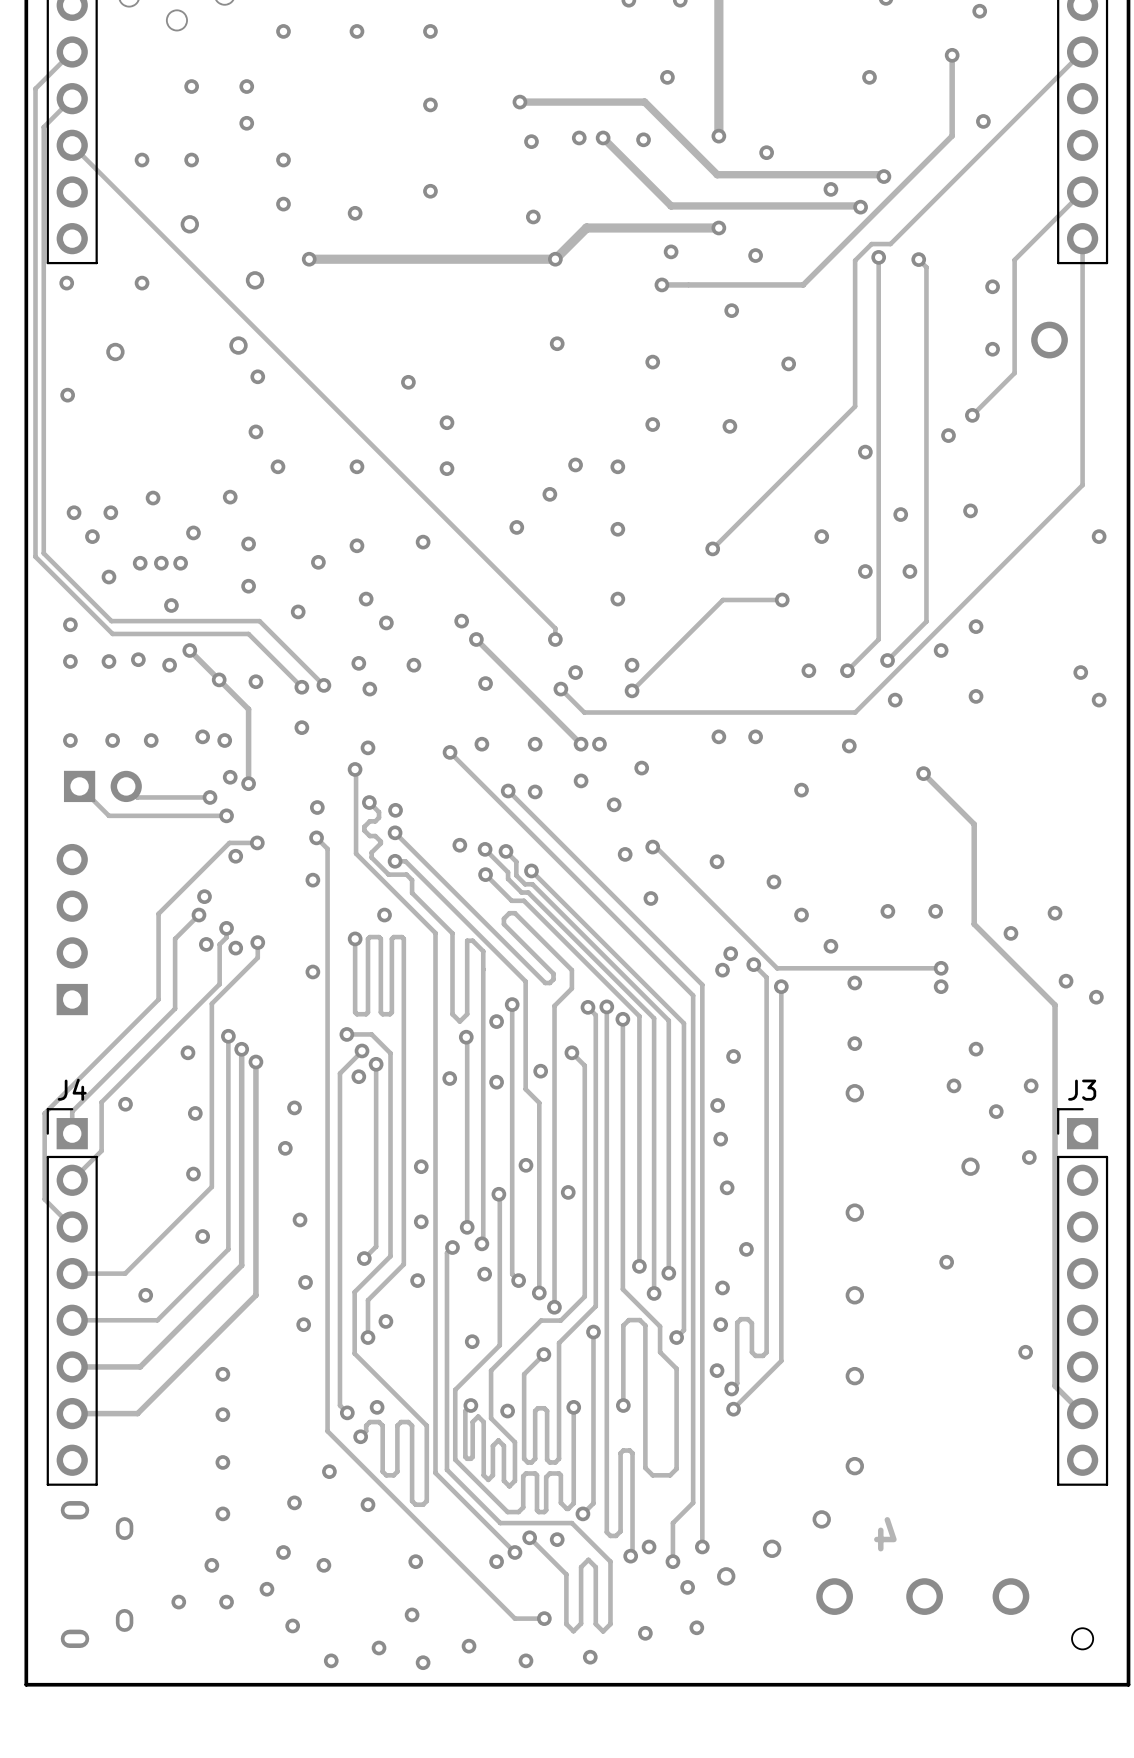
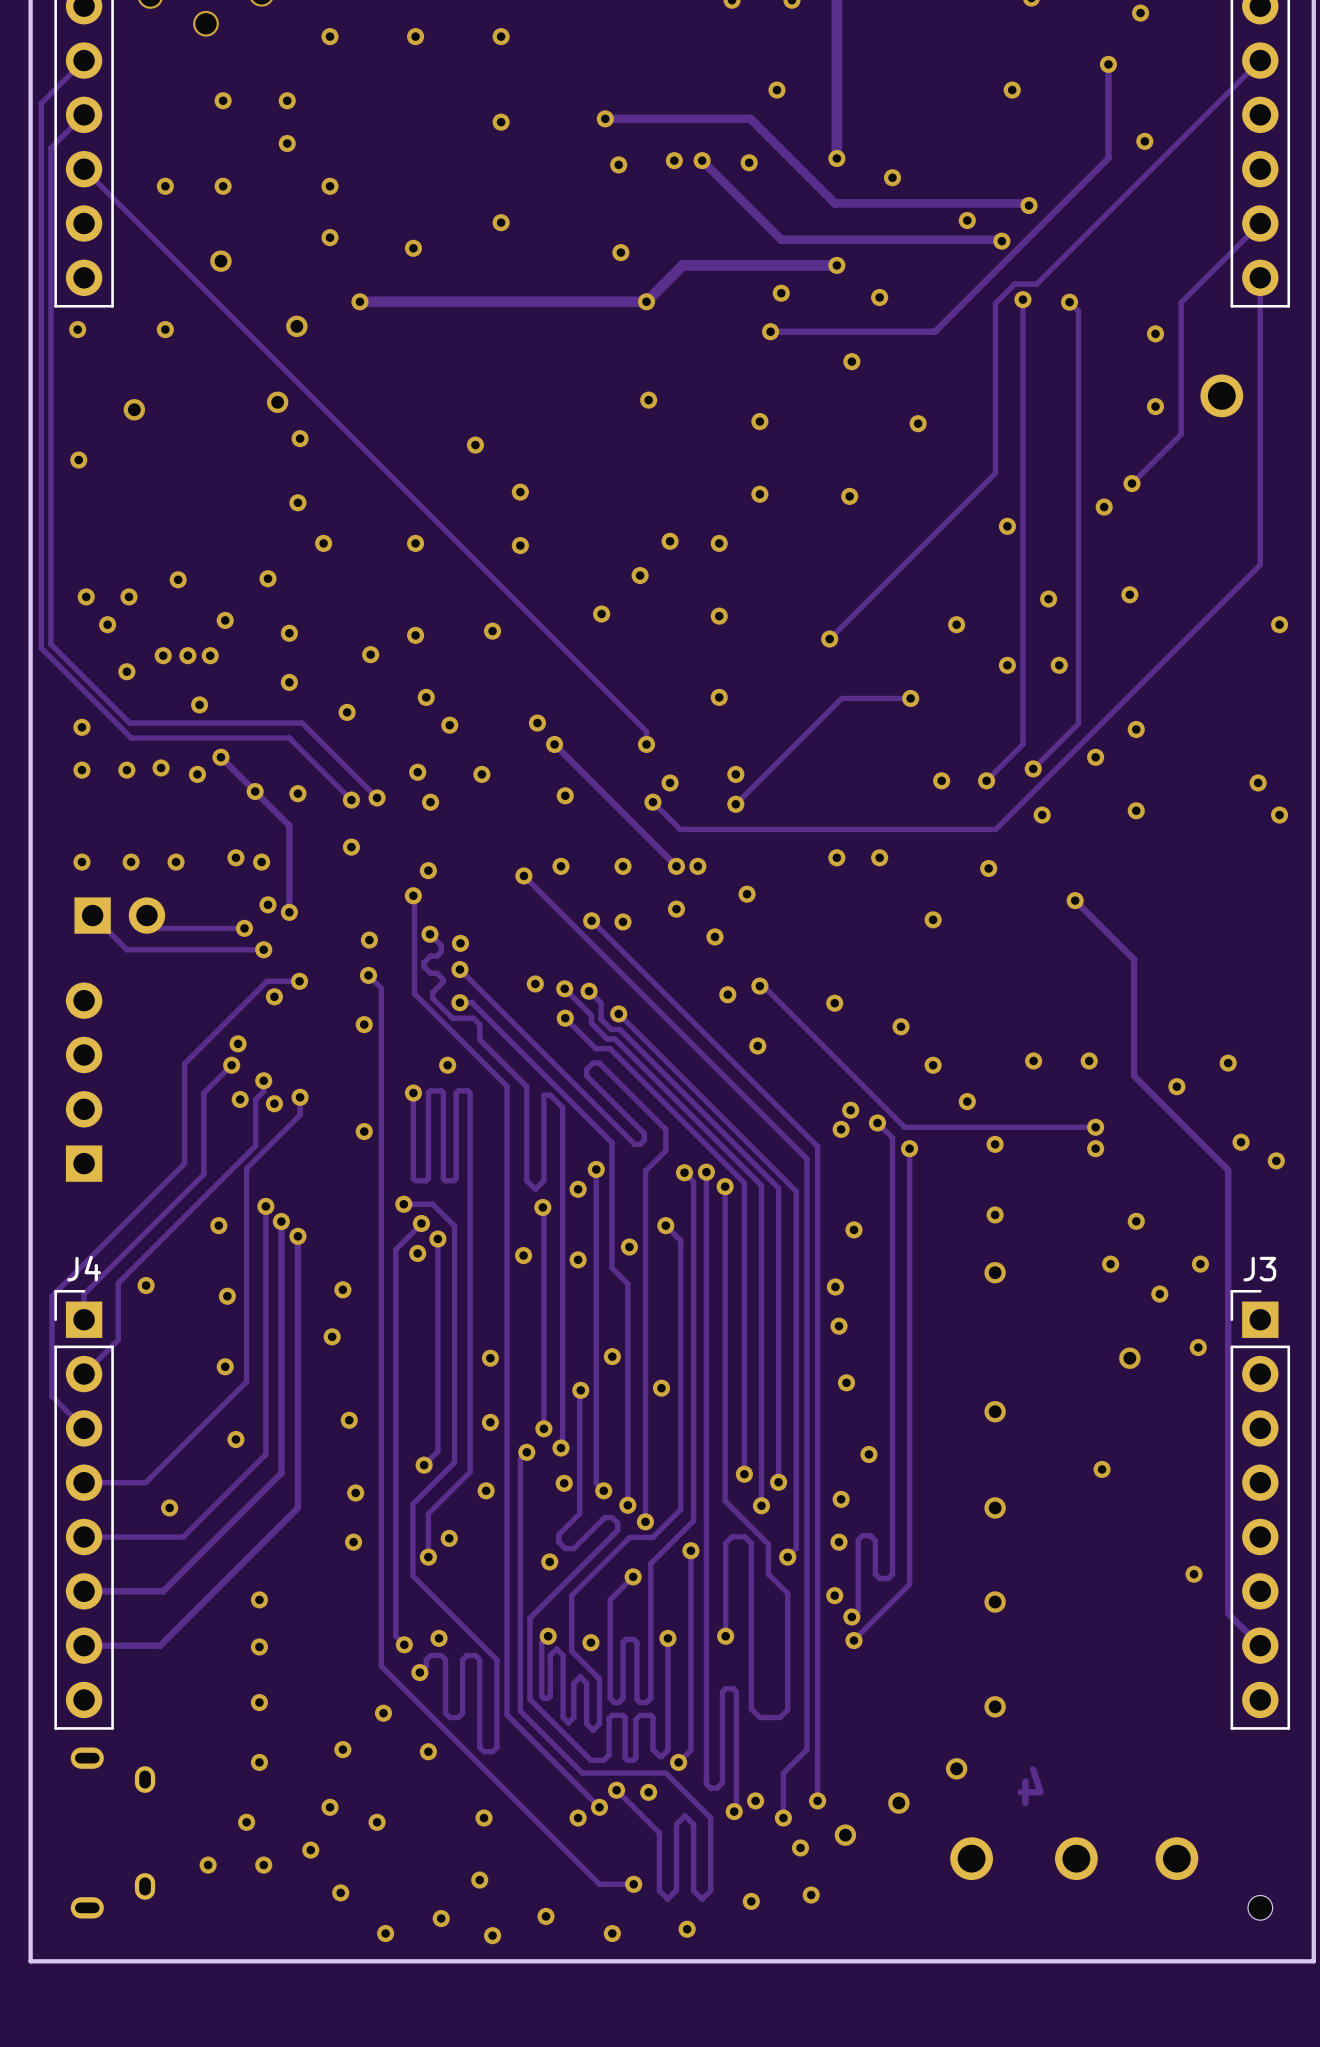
track: (499, 1195) (499, 1345) -> (580, 1390) (579, 1513) (558, 1534) (558, 1542) (565, 1548) (573, 1548) (604, 1517) (612, 1517) (617, 1522) (617, 1530) (581, 1566)

